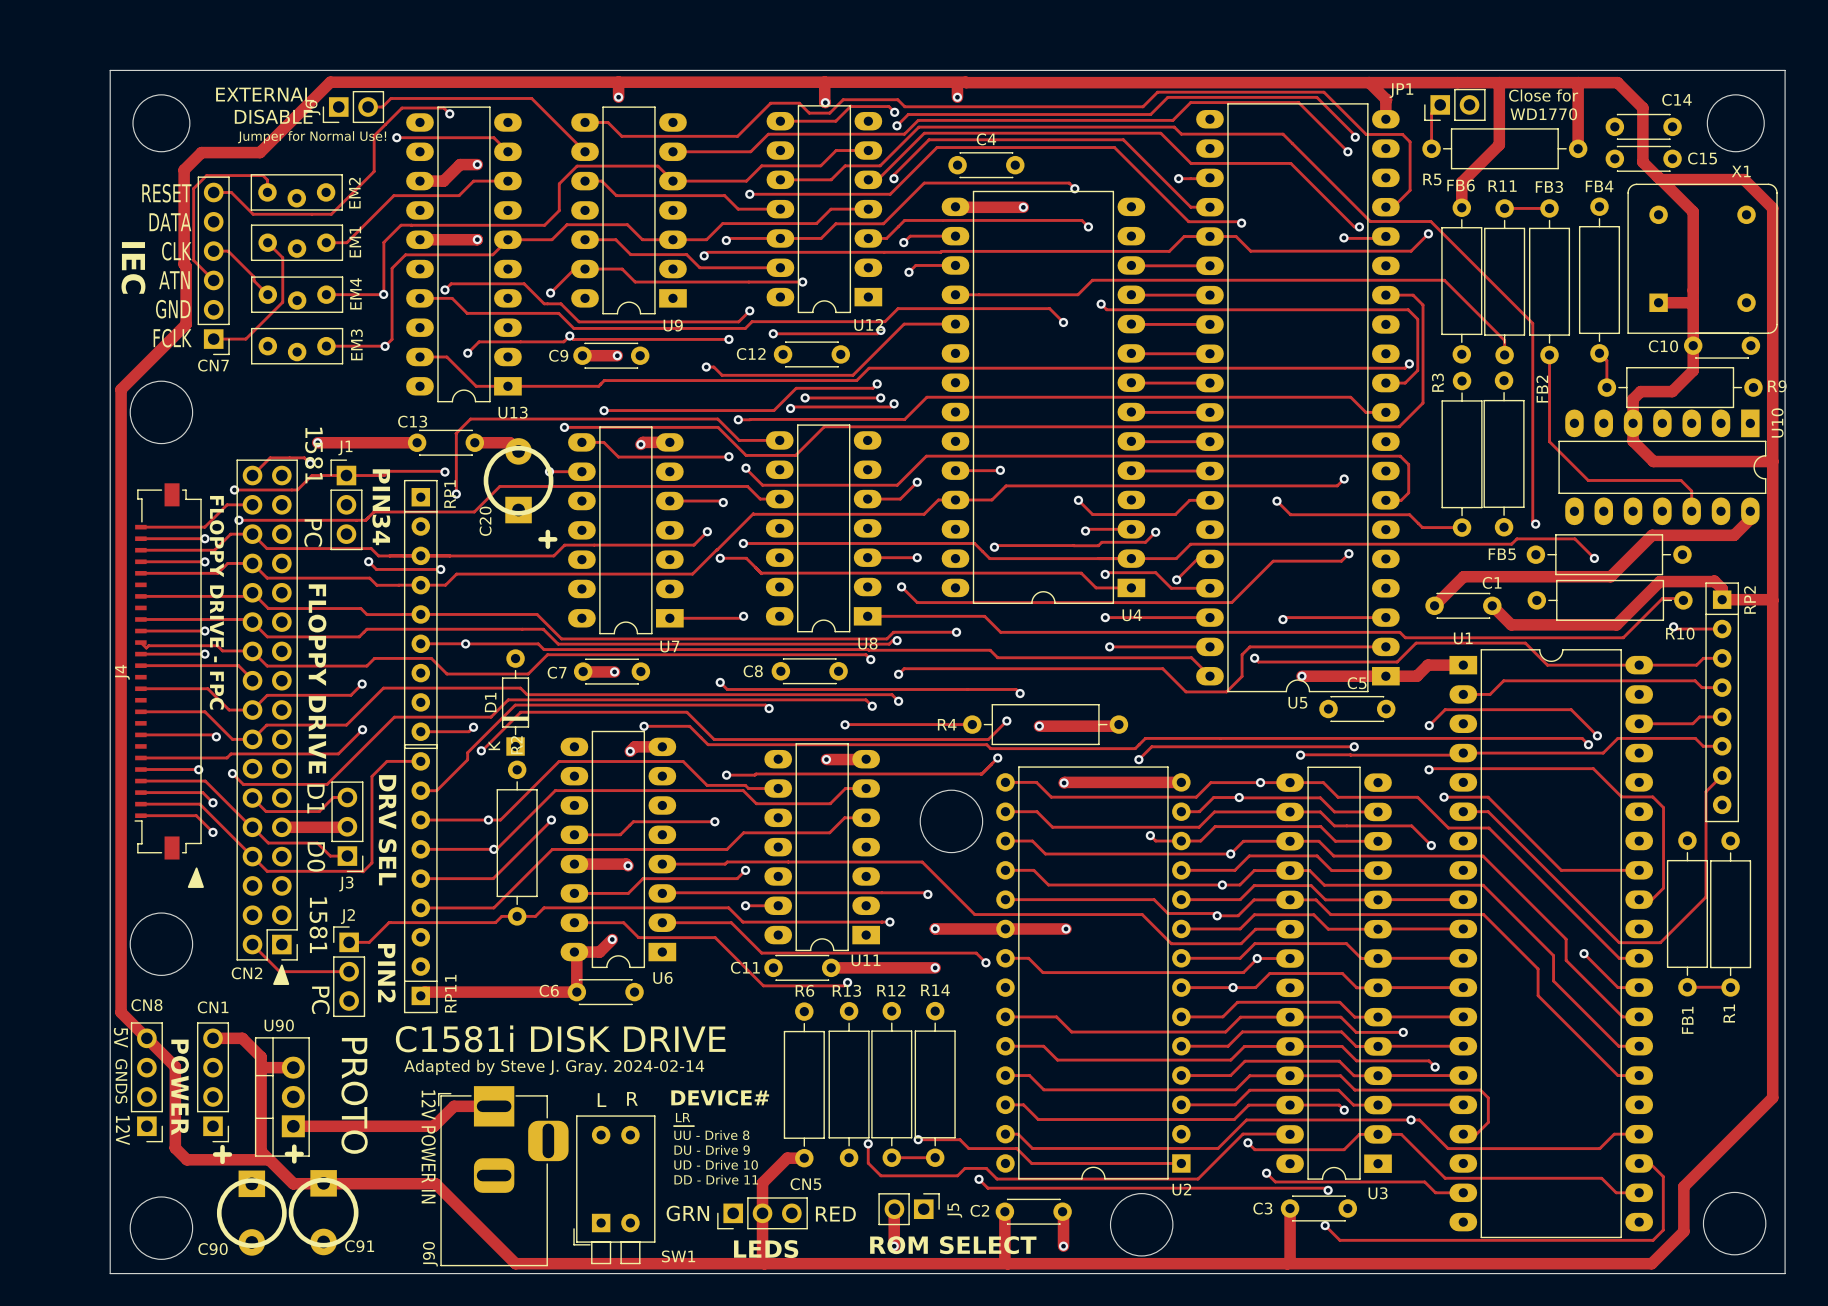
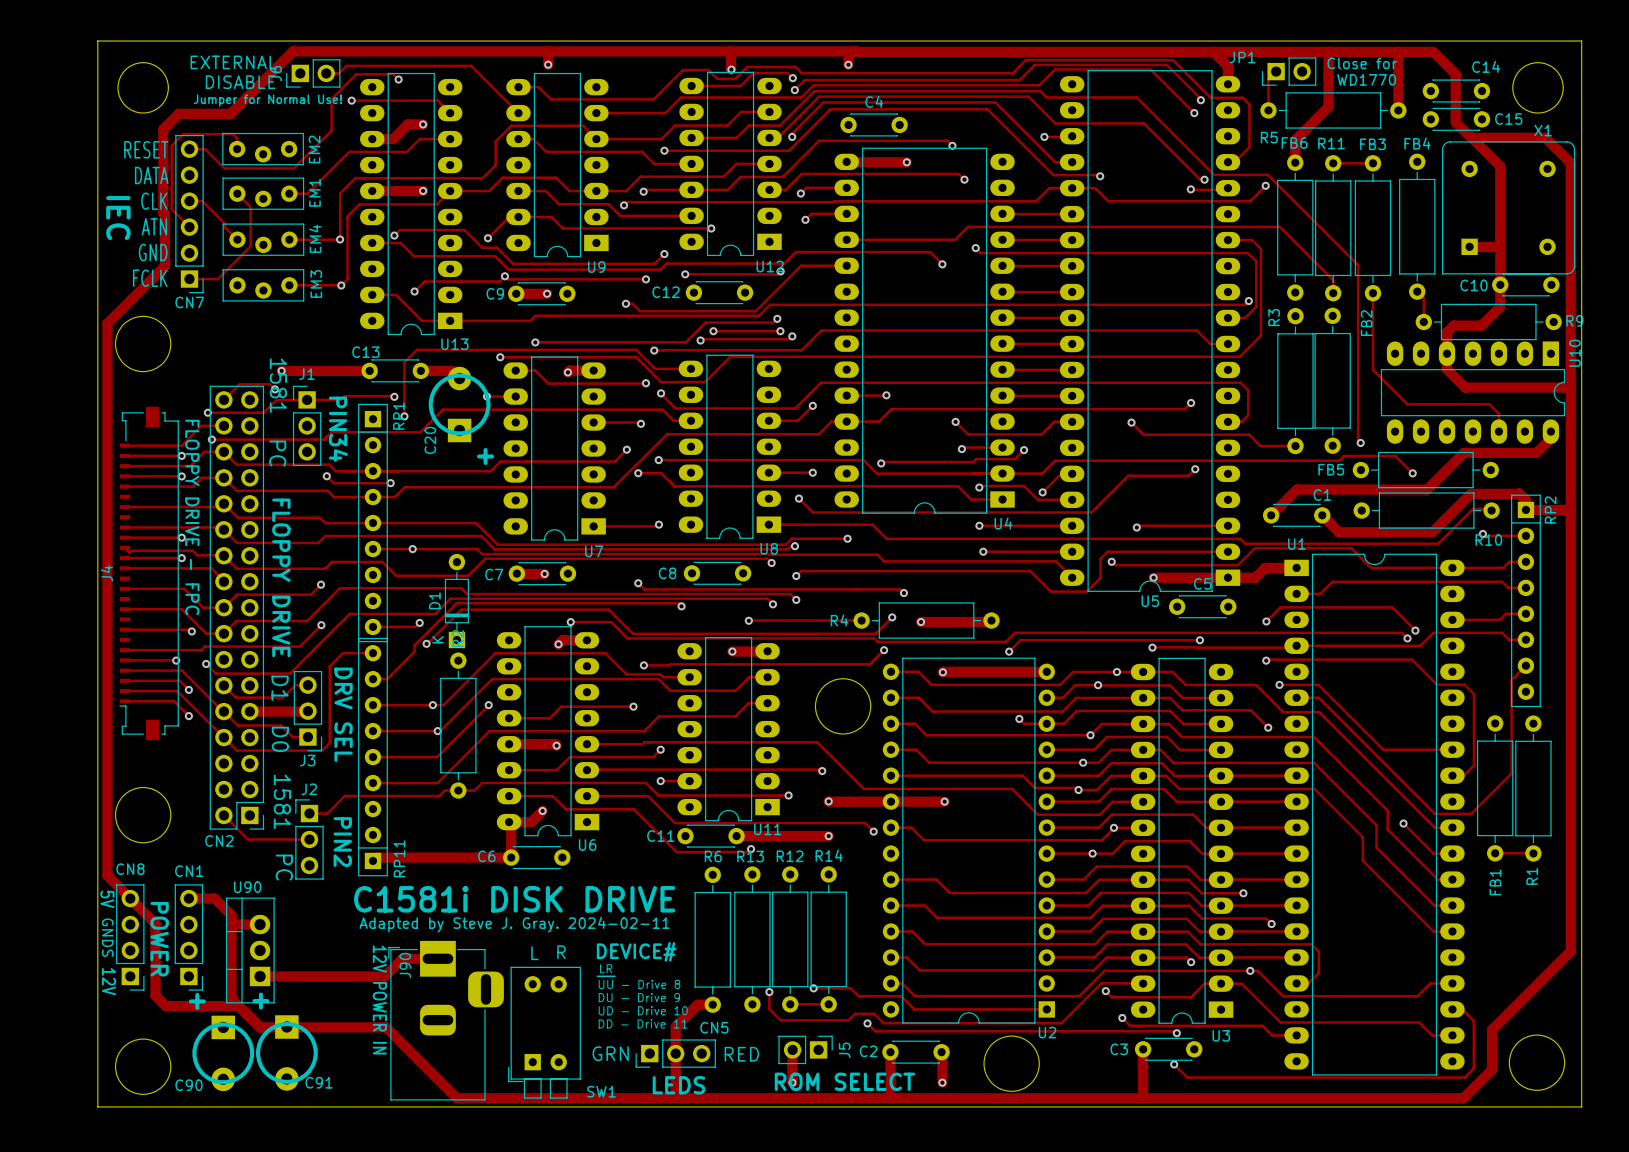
drawing: [187, 867, 204, 888] -> none
drawing: [273, 964, 290, 985] -> none
text: Adapted by Steve J. Gray. 2024-02-14 (554, 1067) -> Adapted by Steve J. Gray. 2024-02-11 (514, 924)
text: PROTO (354, 1095) -> none
J90 name position: J90 (430, 1254) -> J90 (405, 965)

